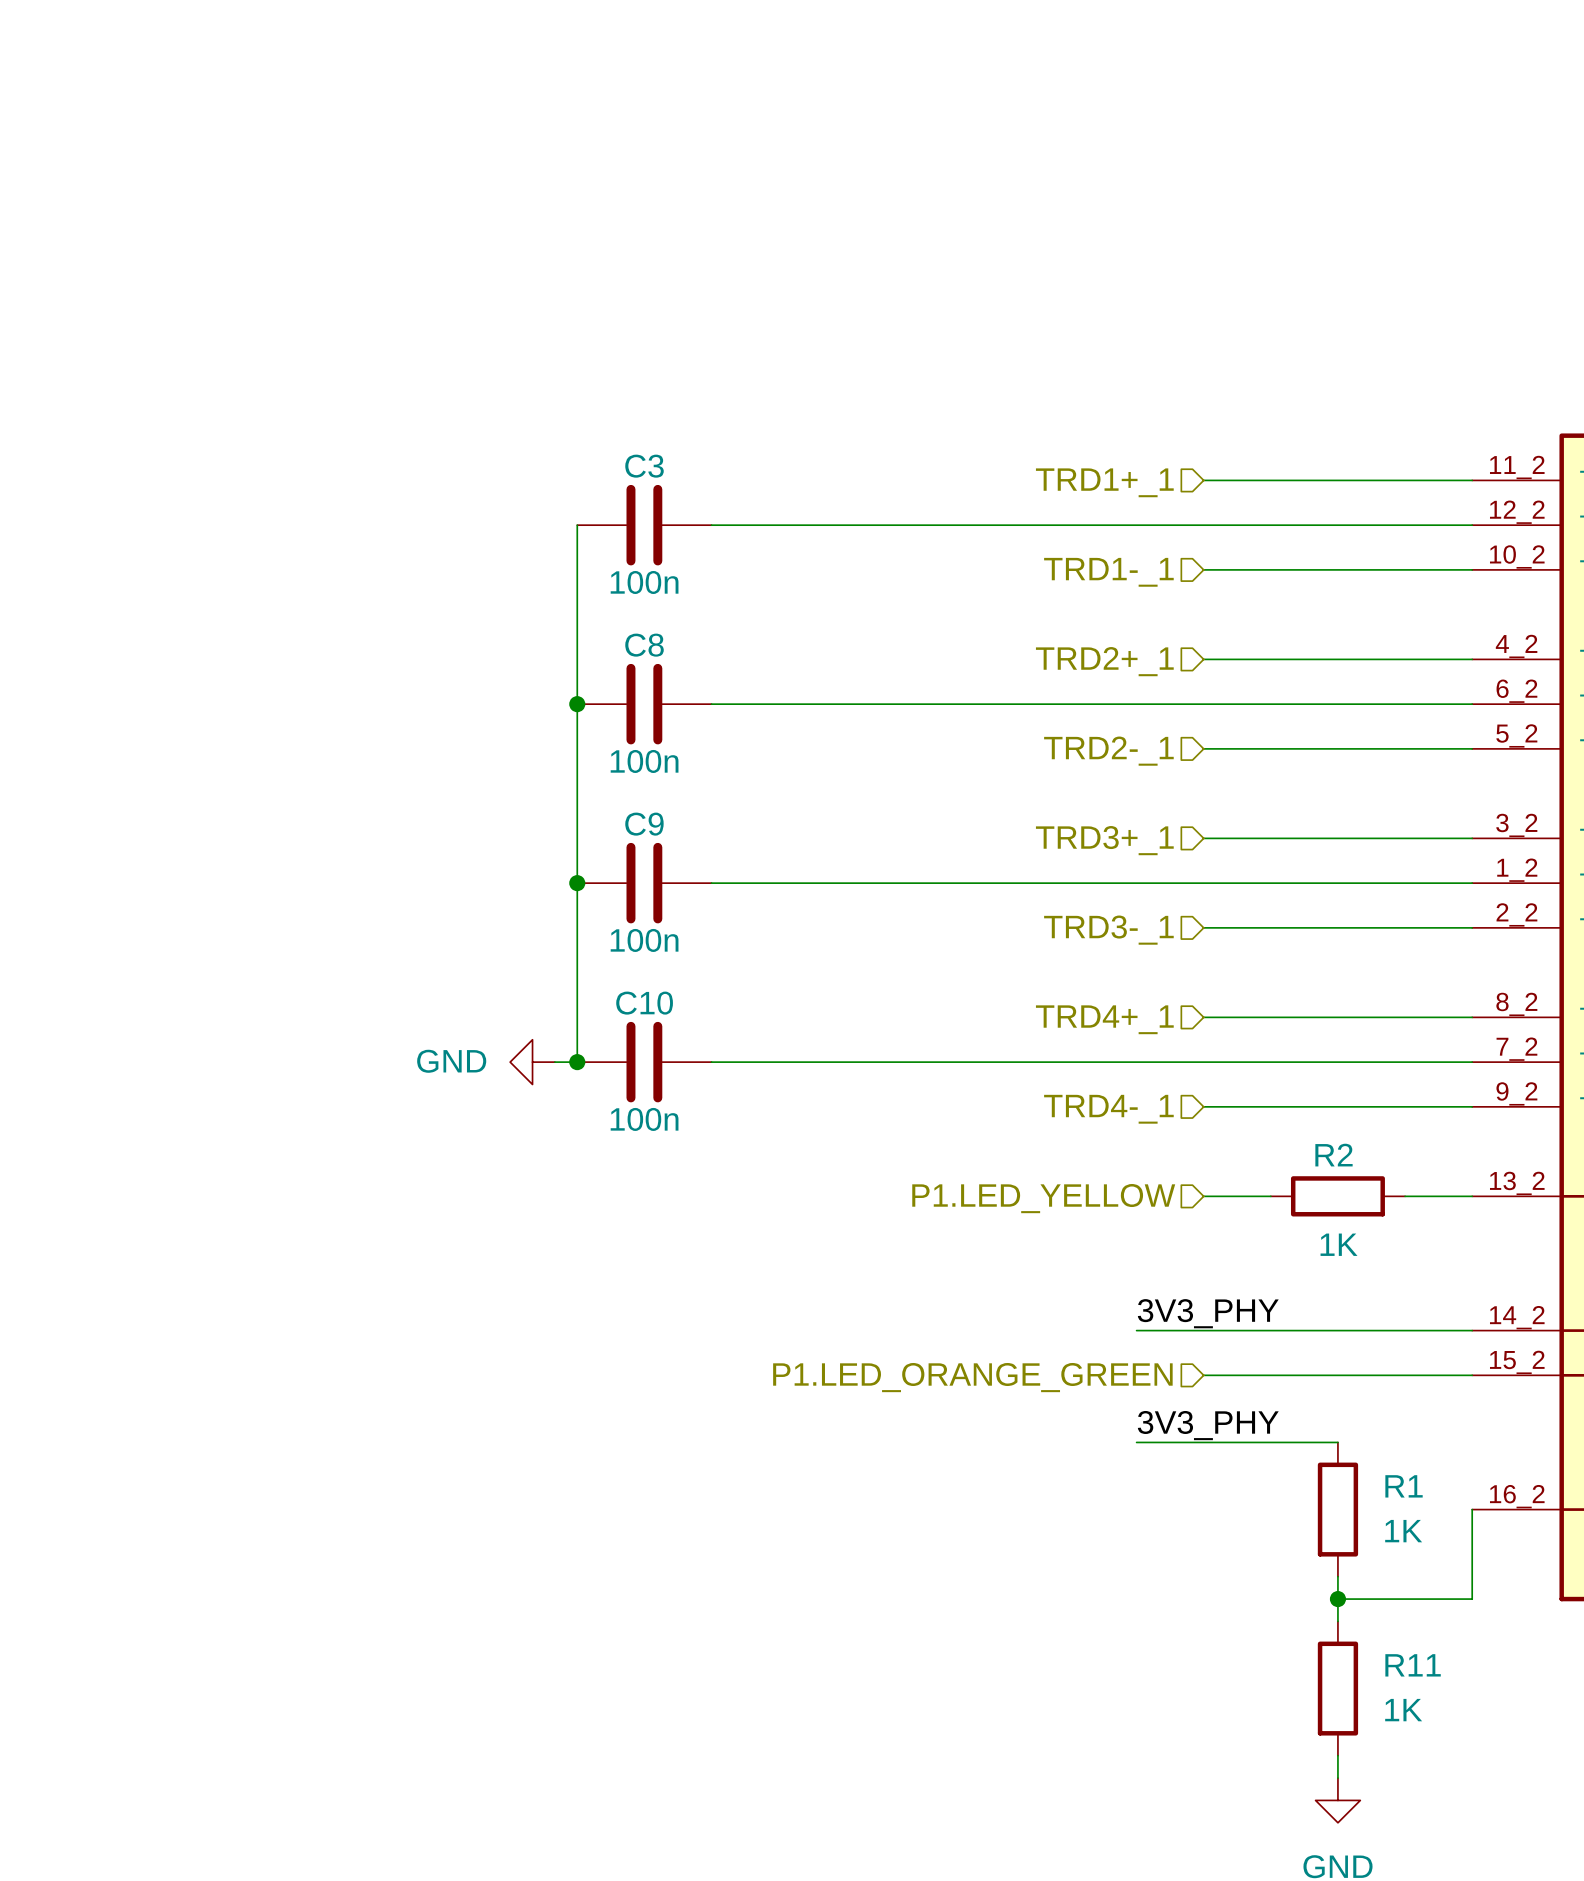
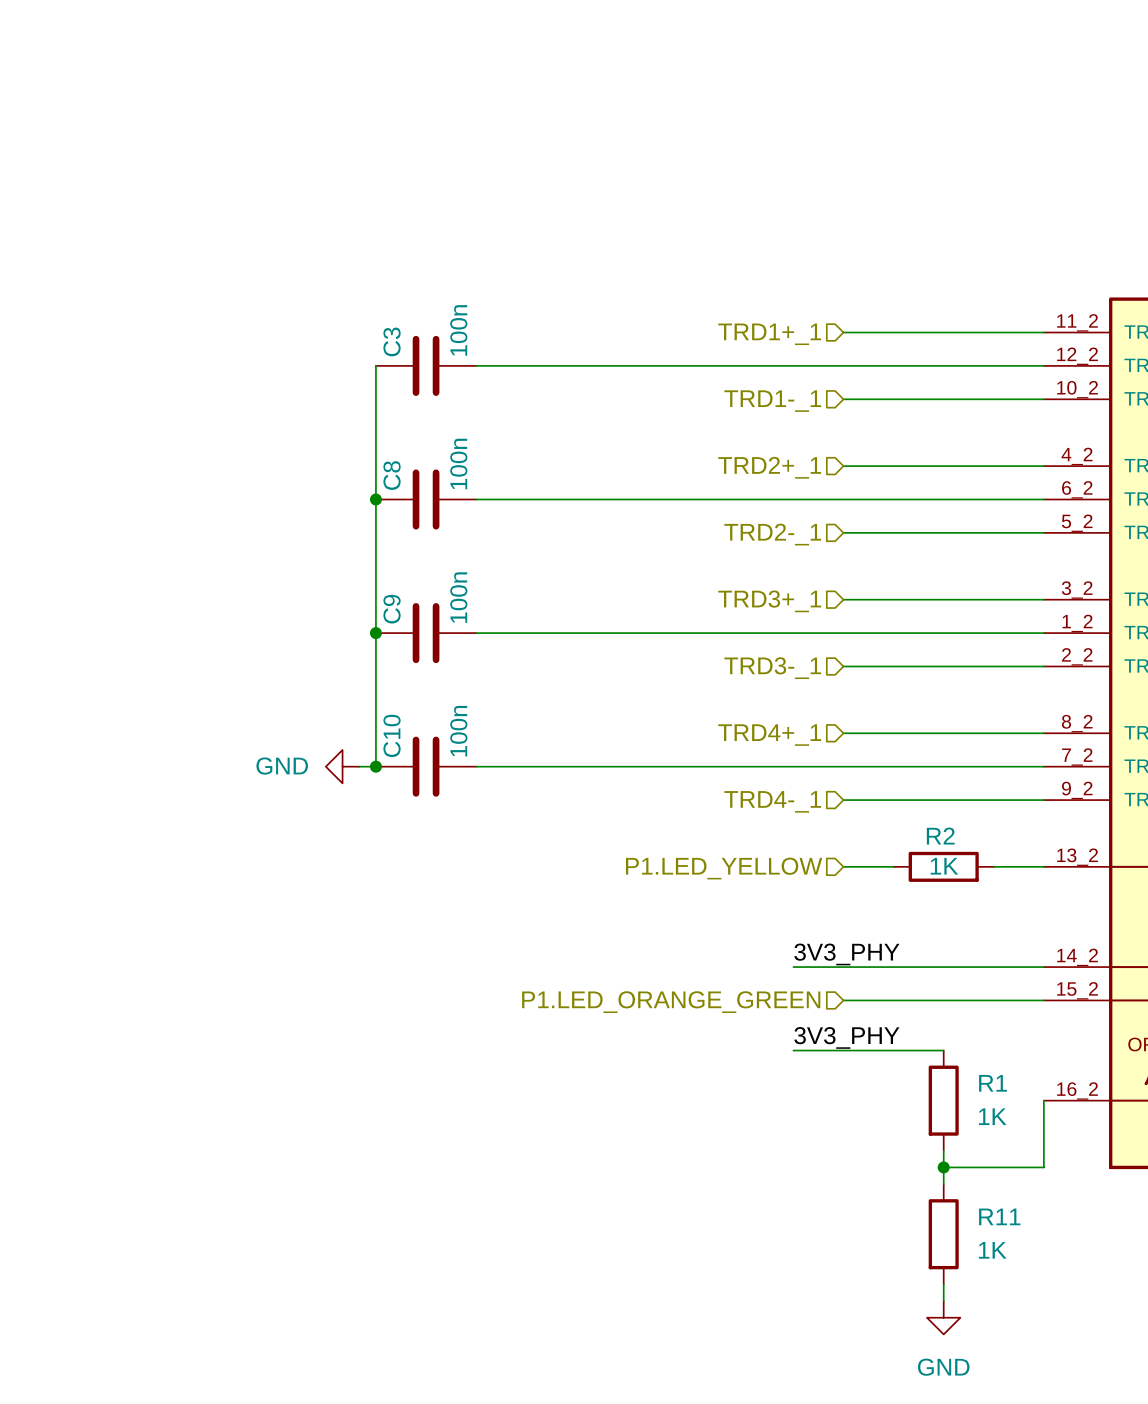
C3 name rotation: 0° (644, 466) -> 90° counterclockwise (392, 341)
C3 value rotation: 0° (644, 582) -> 90° counterclockwise (458, 330)
C3 value position: 100n (644, 582) -> 100n (458, 330)
C8 name rotation: 0° (644, 645) -> 90° counterclockwise (392, 475)
C8 value rotation: 0° (644, 761) -> 90° counterclockwise (458, 464)
C8 value position: 100n (644, 761) -> 100n (458, 464)
C9 name rotation: 0° (644, 824) -> 90° counterclockwise (392, 609)
C9 value rotation: 0° (644, 940) -> 90° counterclockwise (458, 597)
C9 value position: 100n (644, 940) -> 100n (458, 597)
C10 name rotation: 0° (644, 1003) -> 90° counterclockwise (392, 735)
C10 value rotation: 0° (644, 1119) -> 90° counterclockwise (458, 731)
C10 value position: 100n (644, 1119) -> 100n (458, 731)
R2 value position: 1K (1339, 1244) -> 1K (944, 866)

